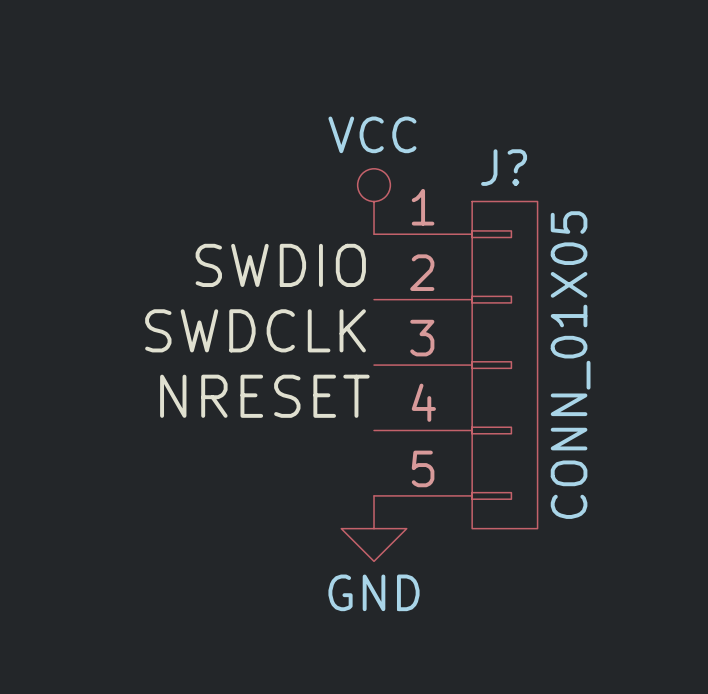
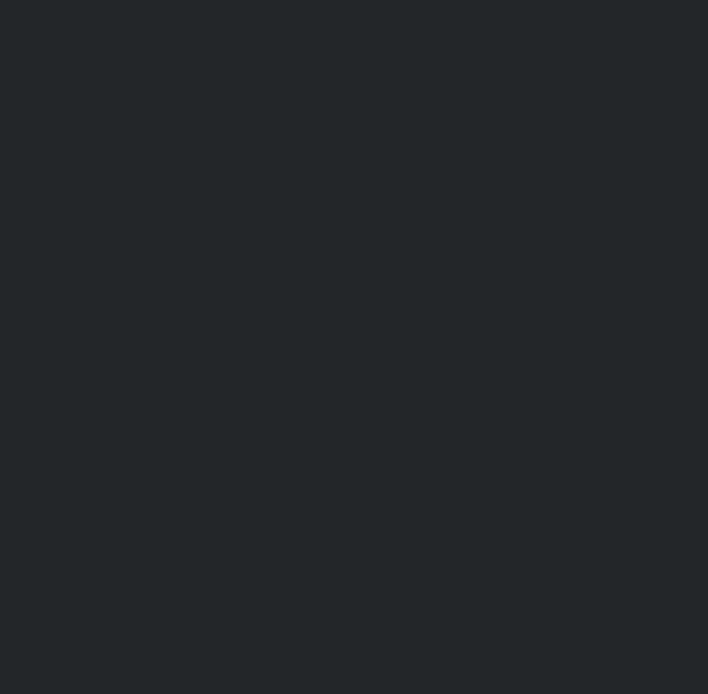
power symbol: VCC (374, 201) -> none
label: SWDIO (280, 265) -> none
label: SWDCLK (255, 330) -> none
J?: CONN_01X05 (455, 365) -> none
label: NRESET (264, 396) -> none
power symbol: GND (374, 528) -> none

